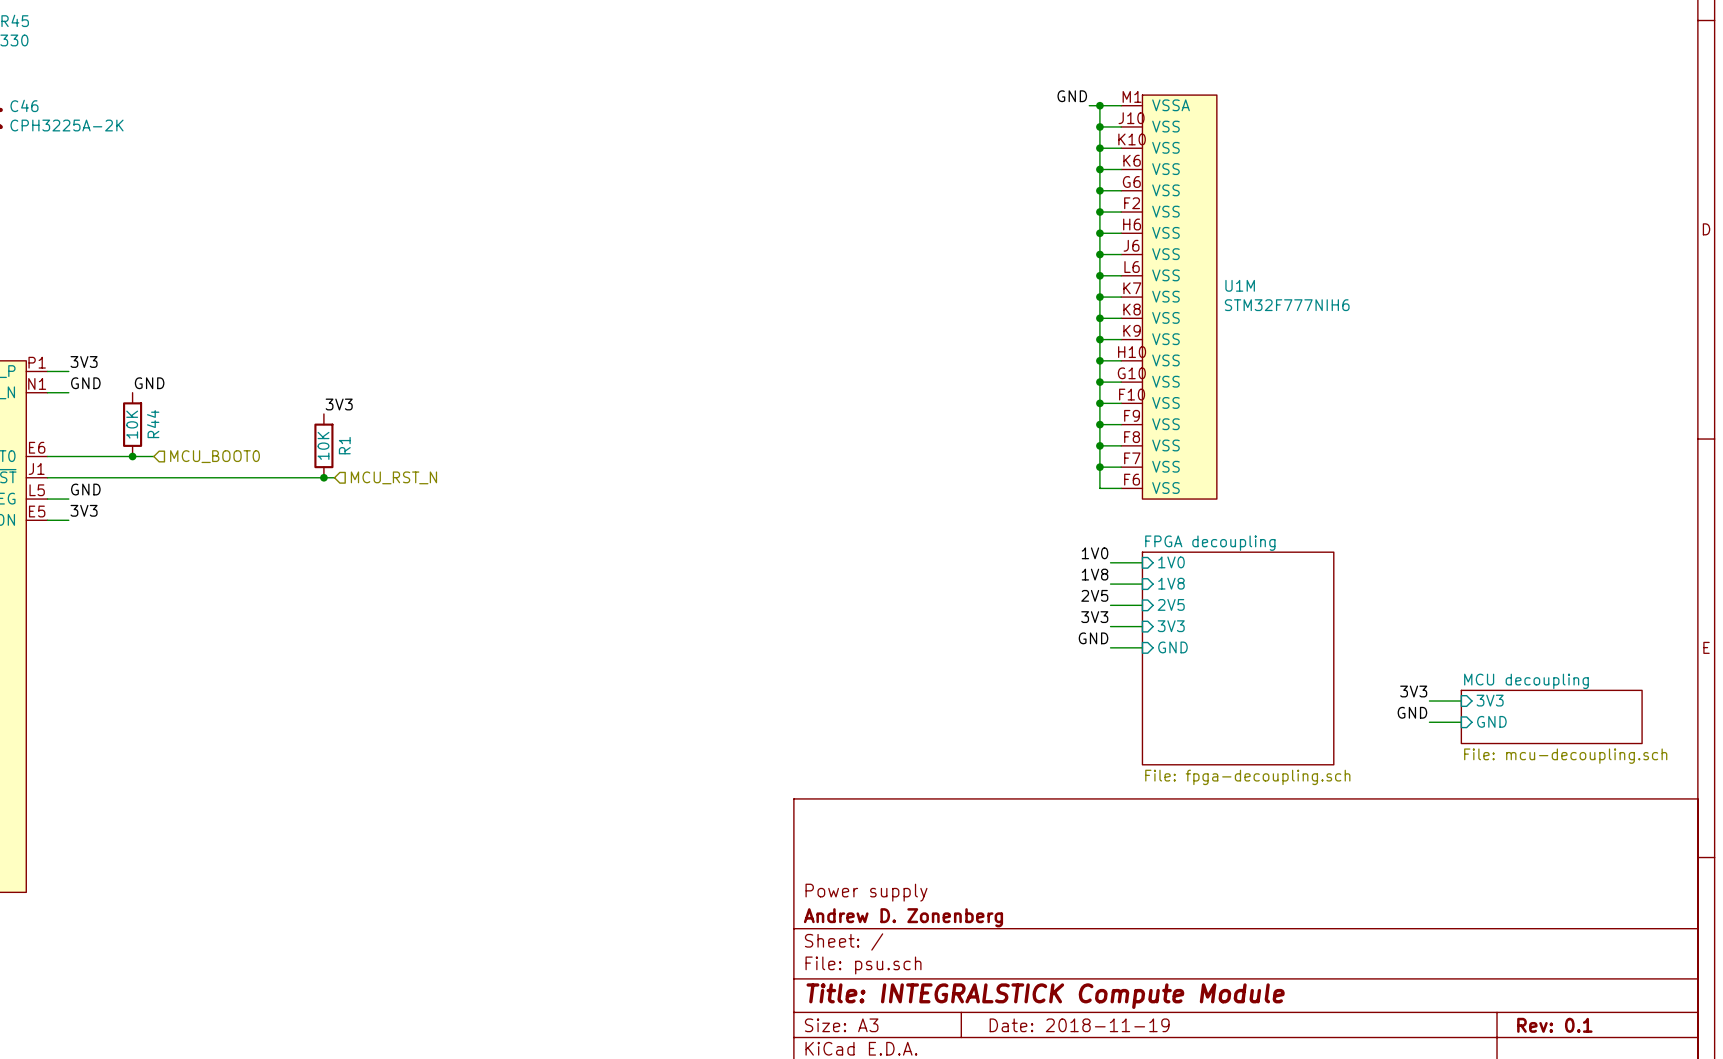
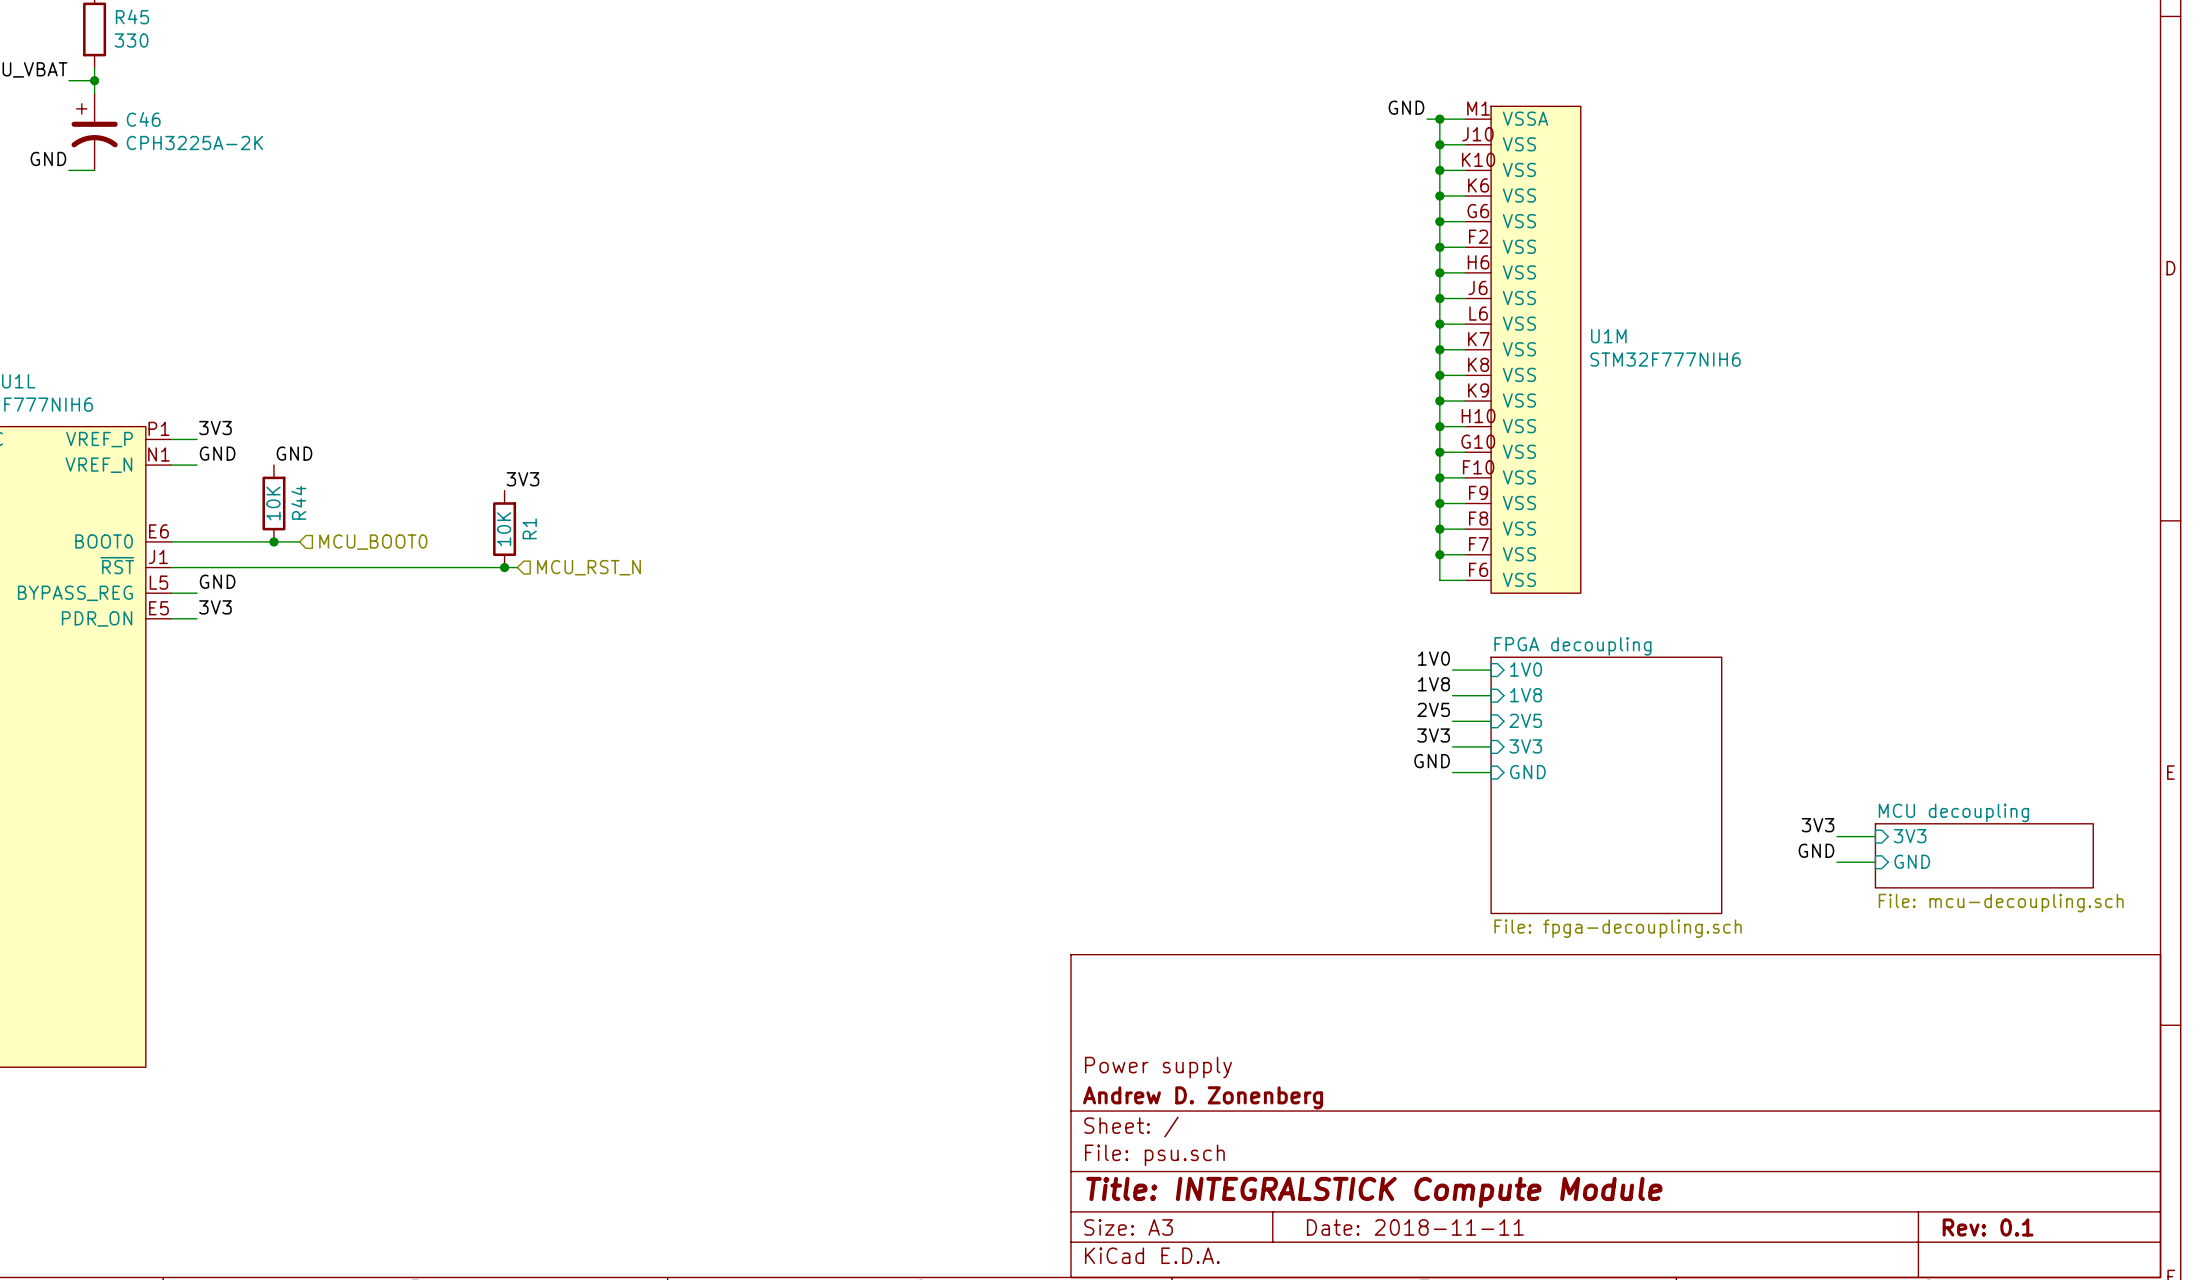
title block: Date: 2018-11-19 (1079, 1025) -> Date: 2018-11-11 (1415, 1227)

